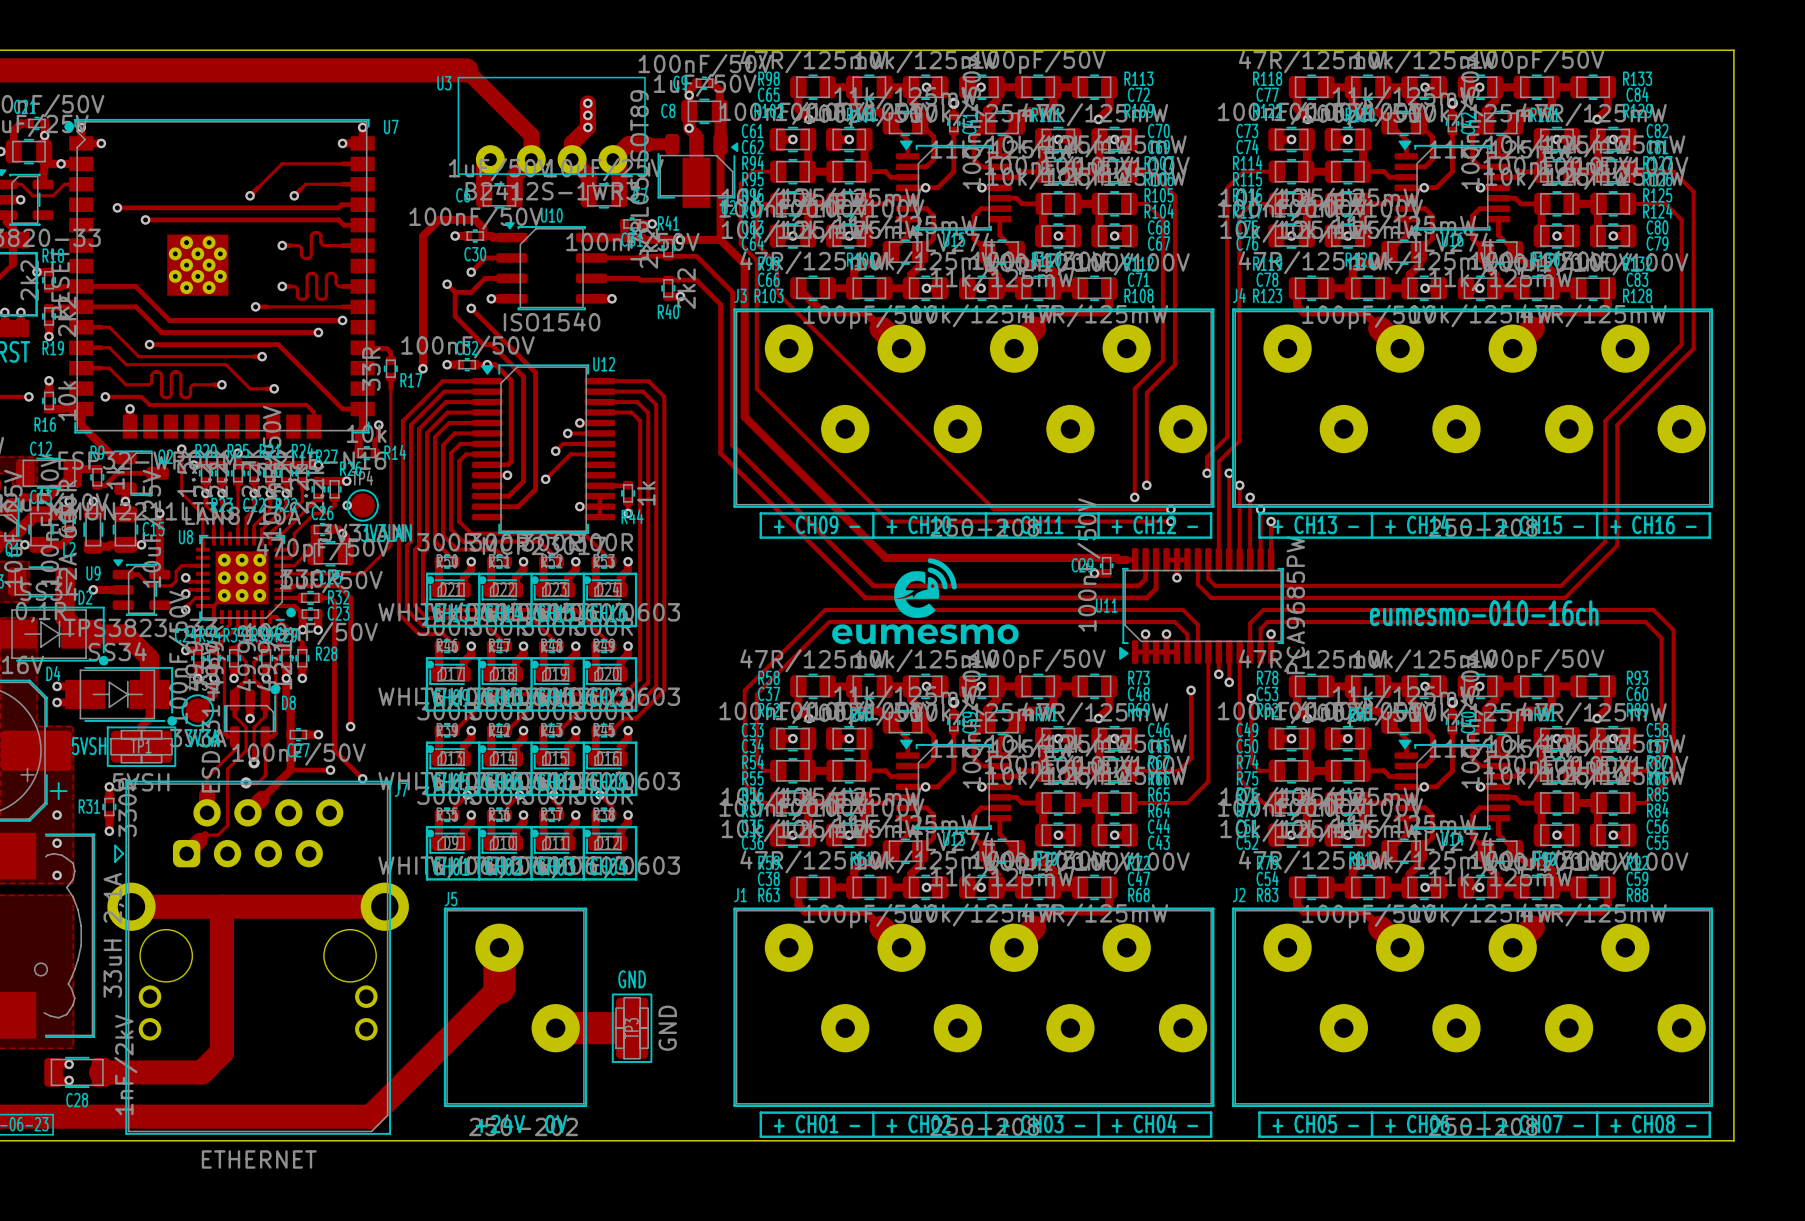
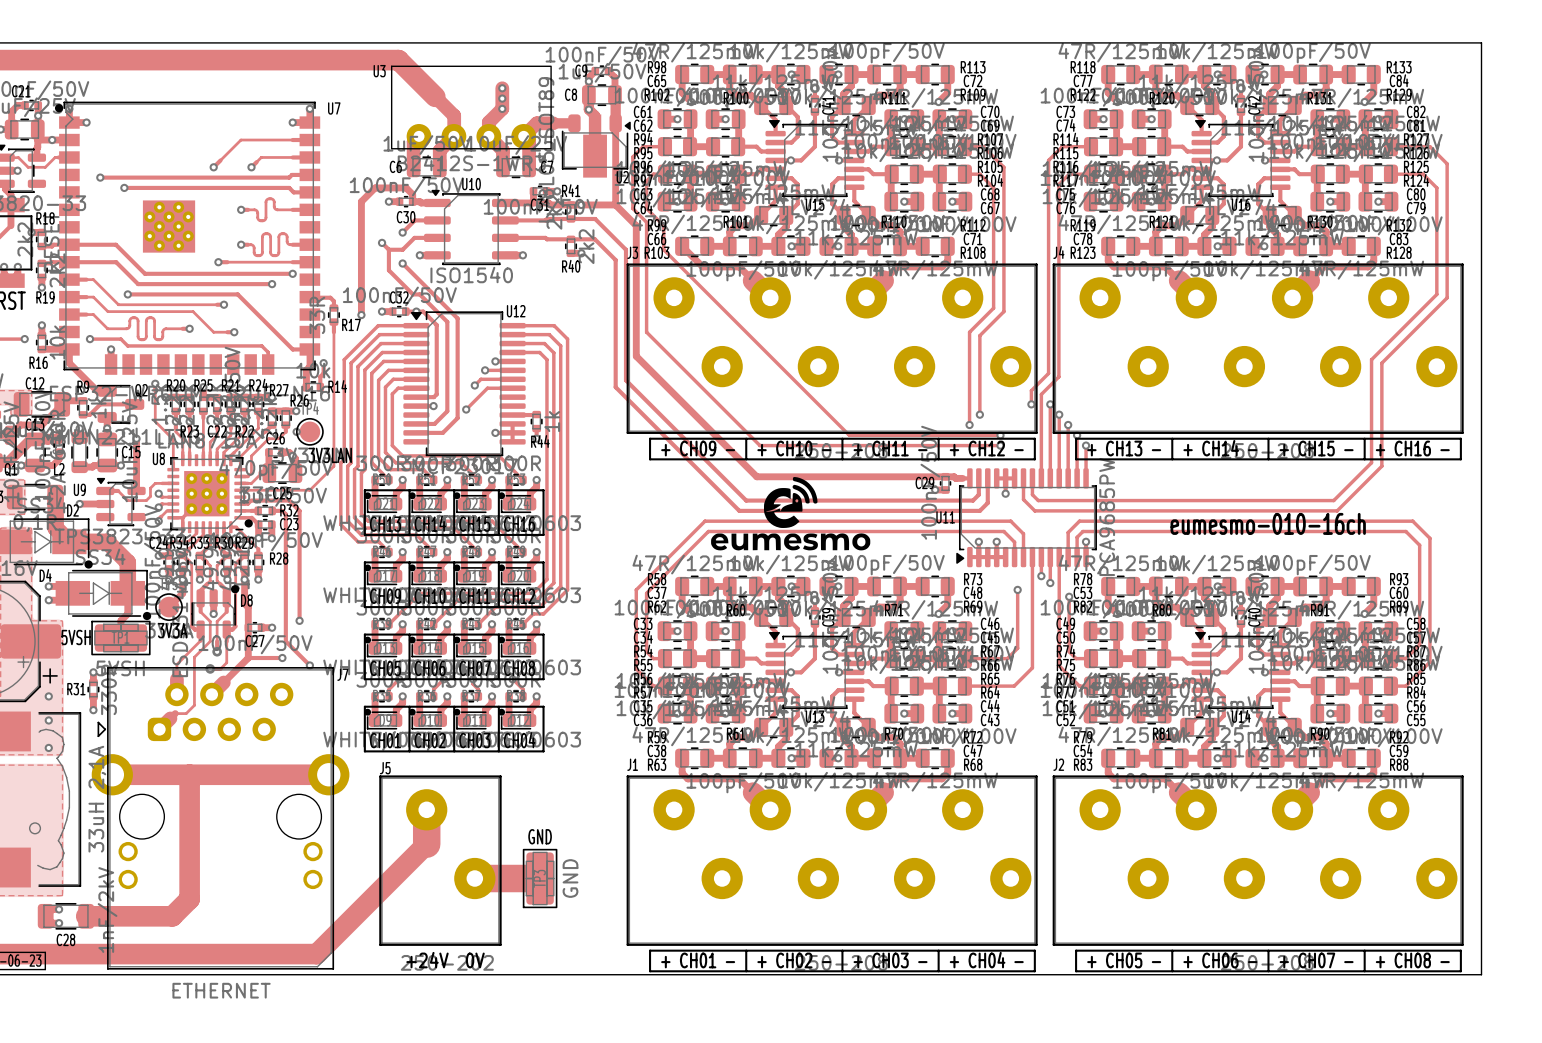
track width: thin (466, 70) (509, 113) -> thick (398, 60) (435, 96)

